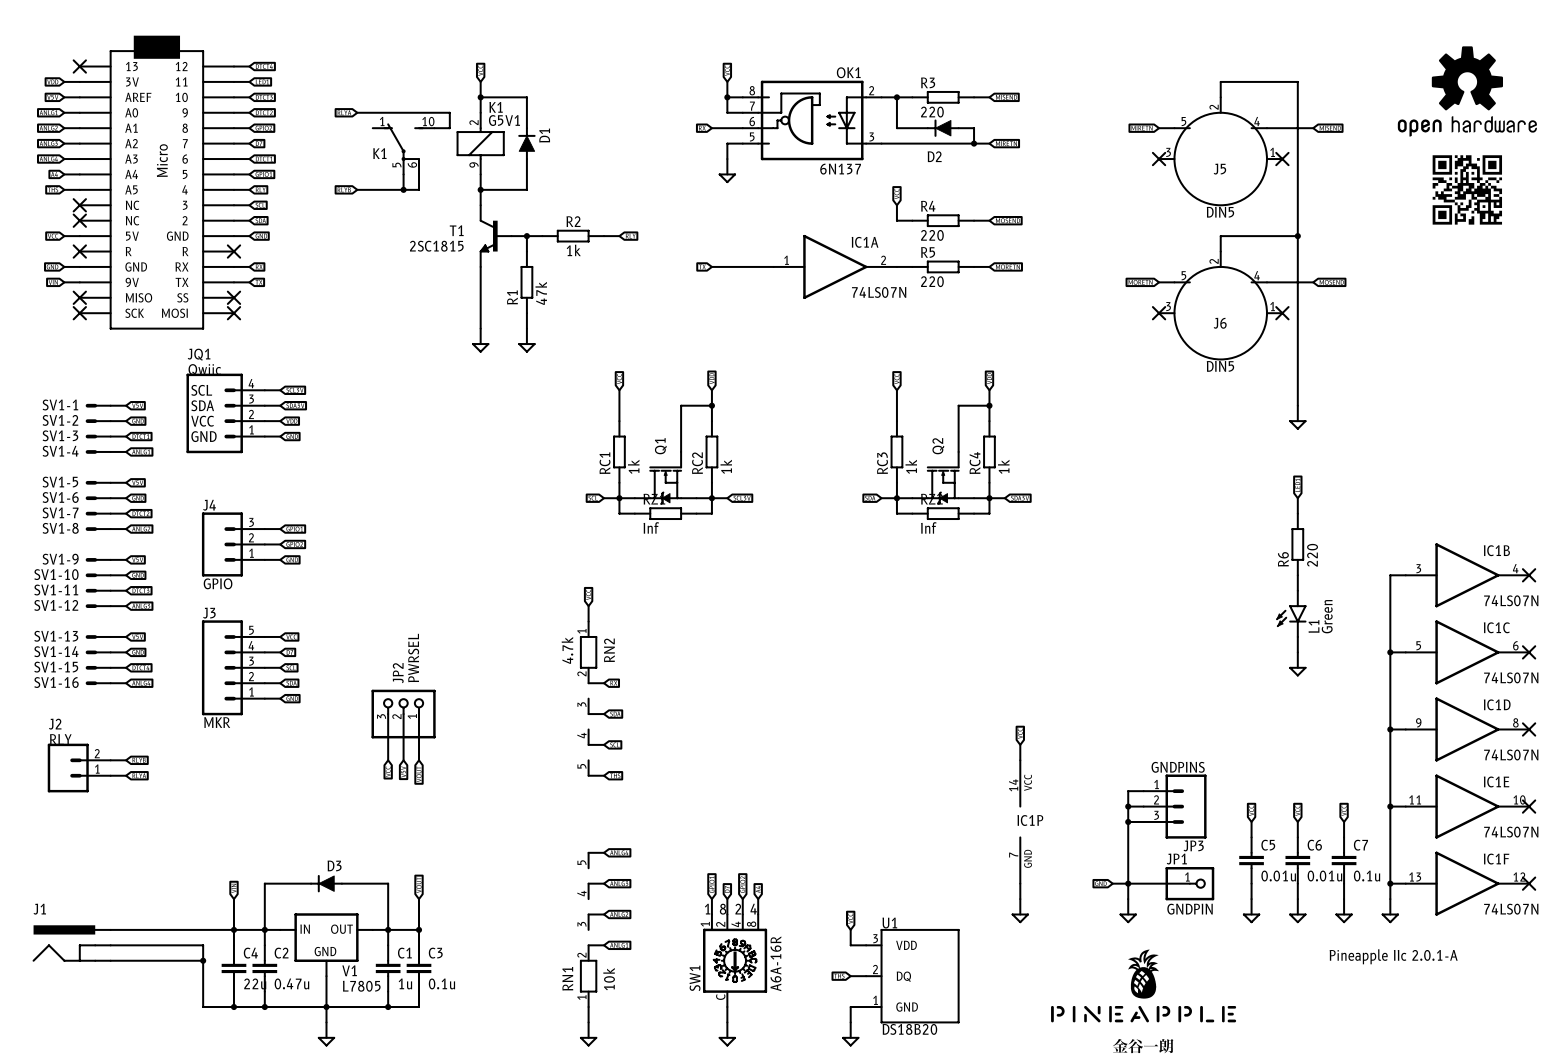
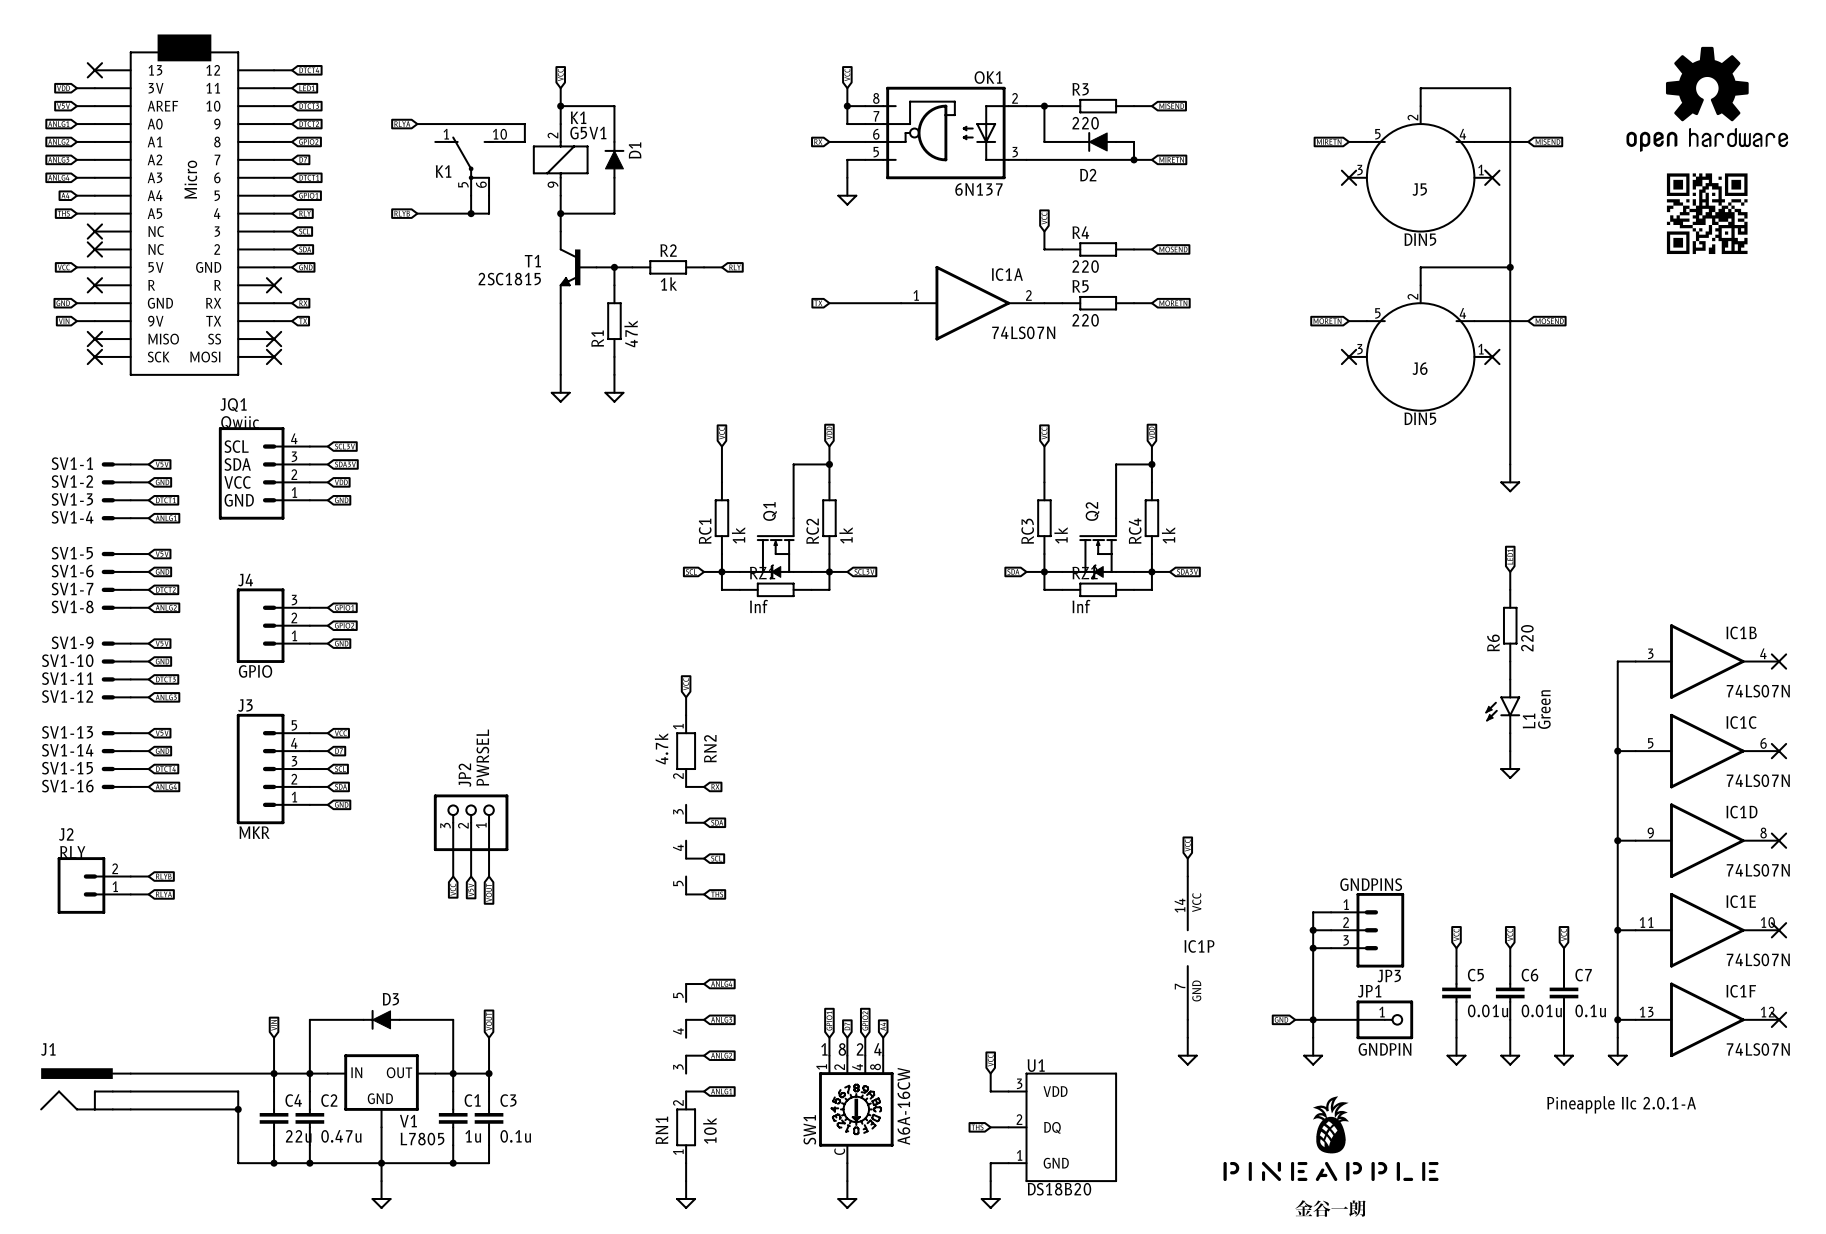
SW1 value: A6A-16R (775, 963) -> A6A-16CW (903, 1106)

